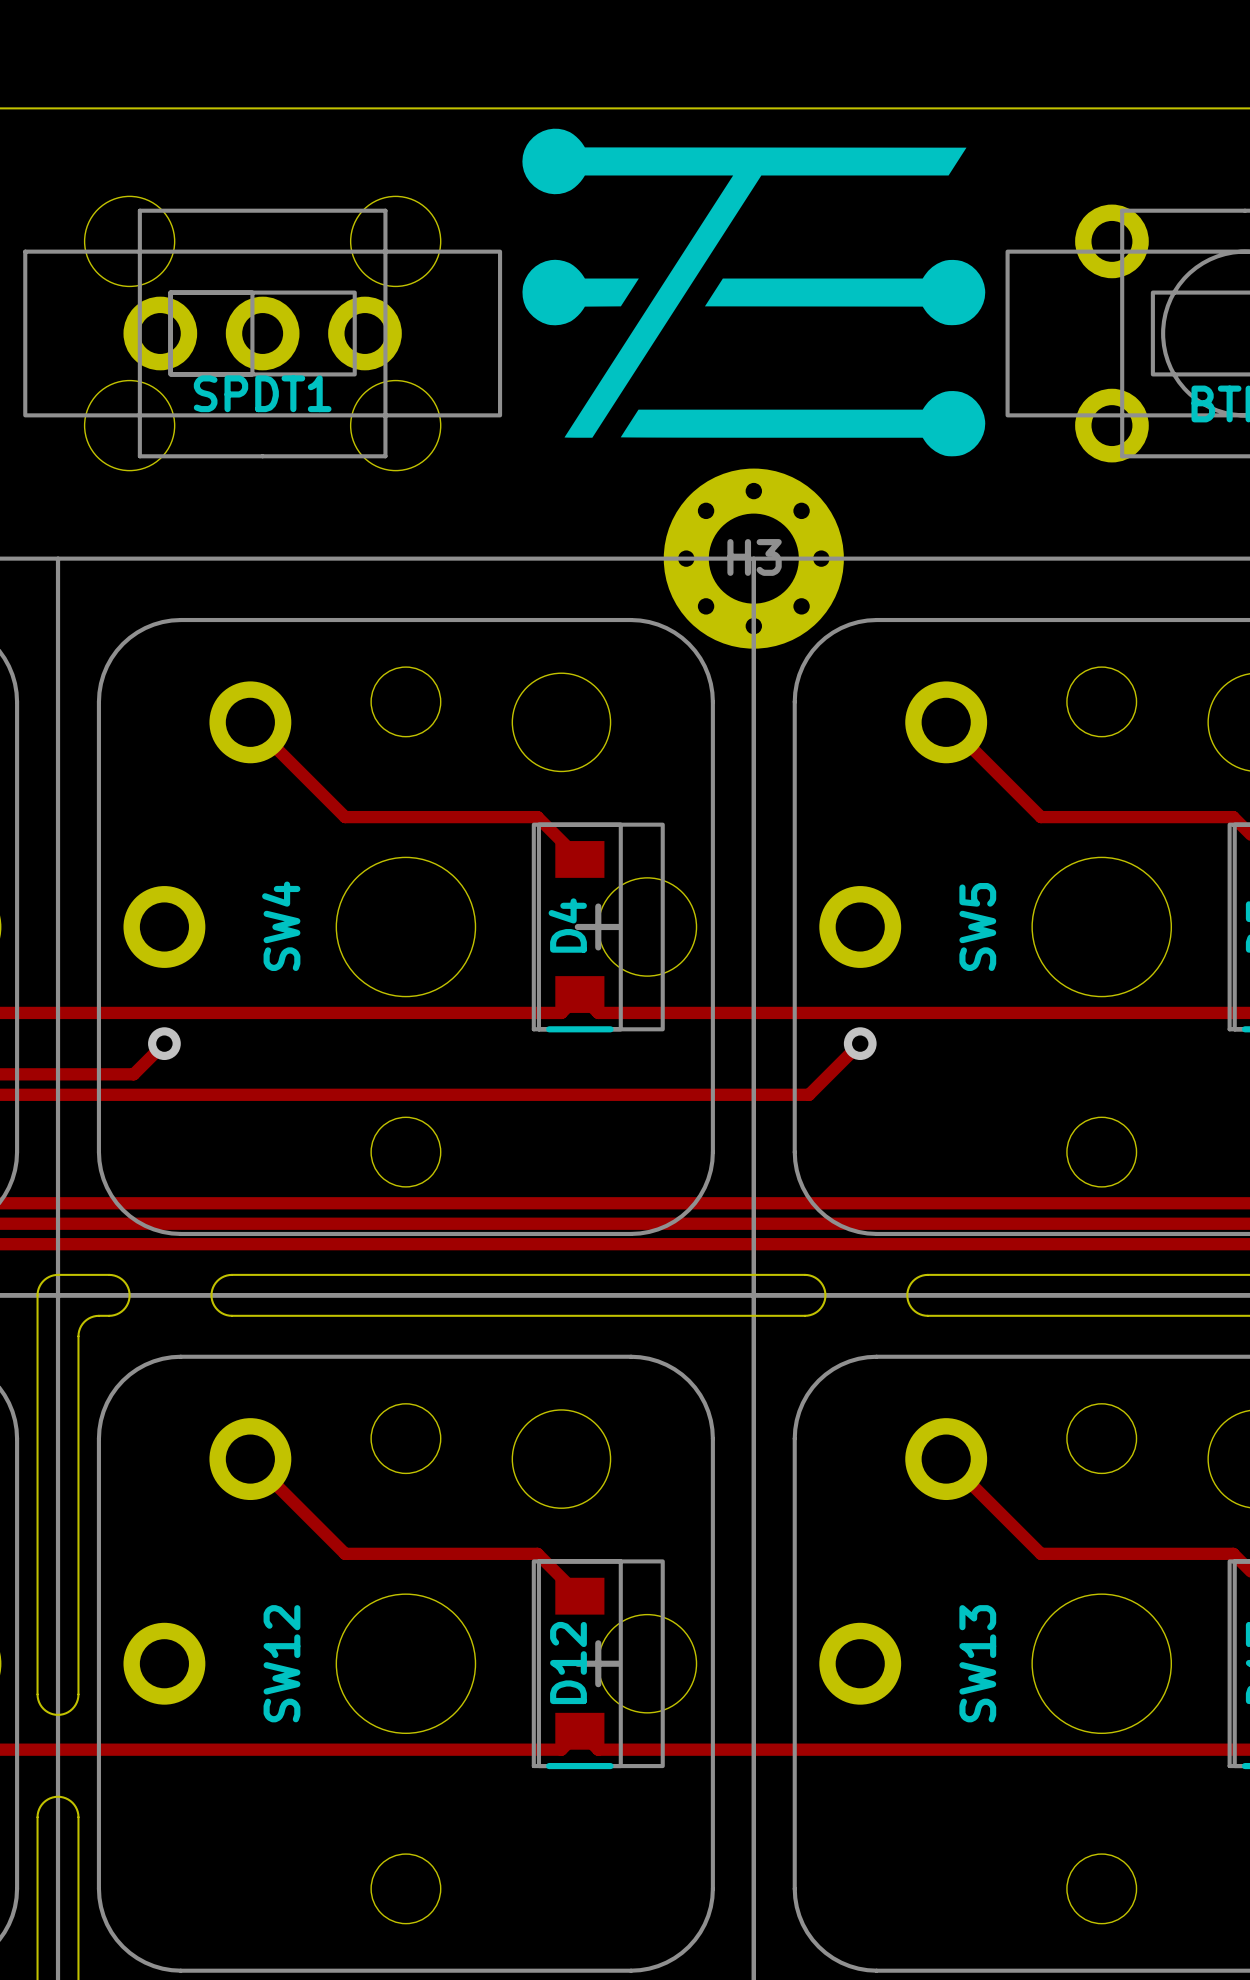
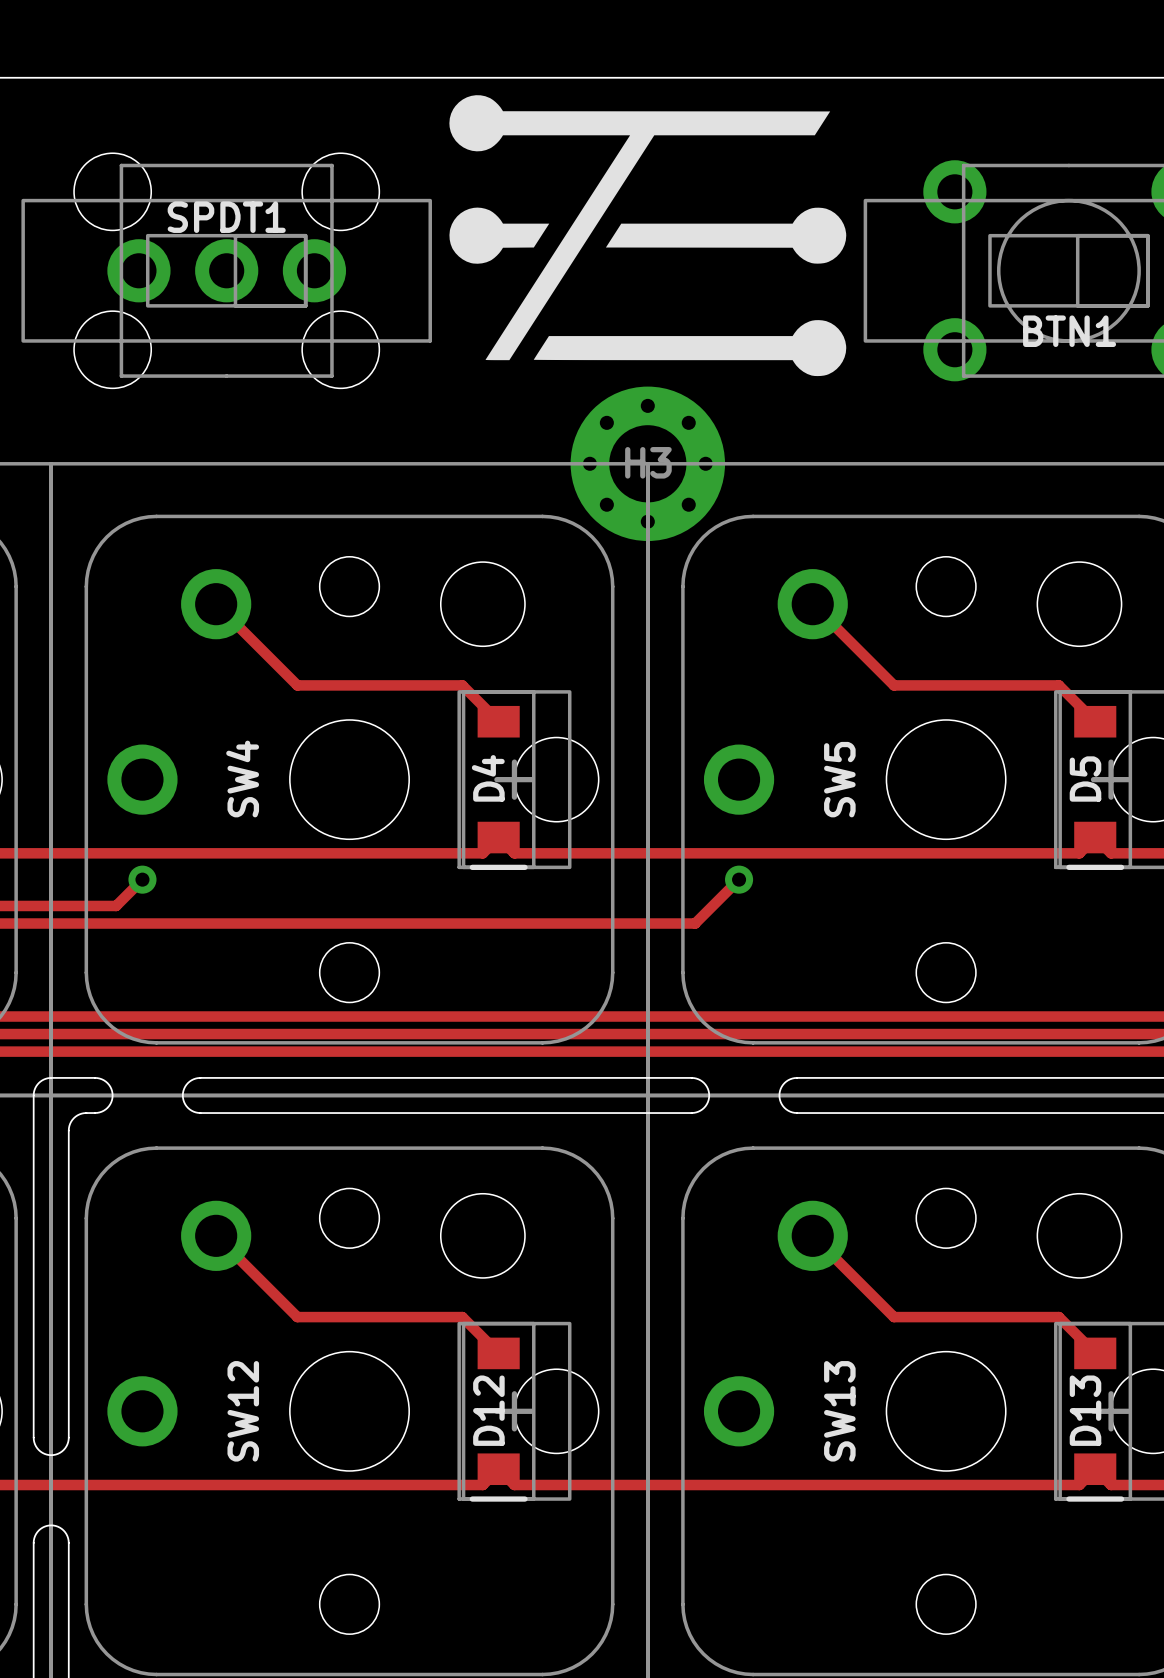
SPDT1 rotation: 0° (262, 333) -> 180° (226, 270)

